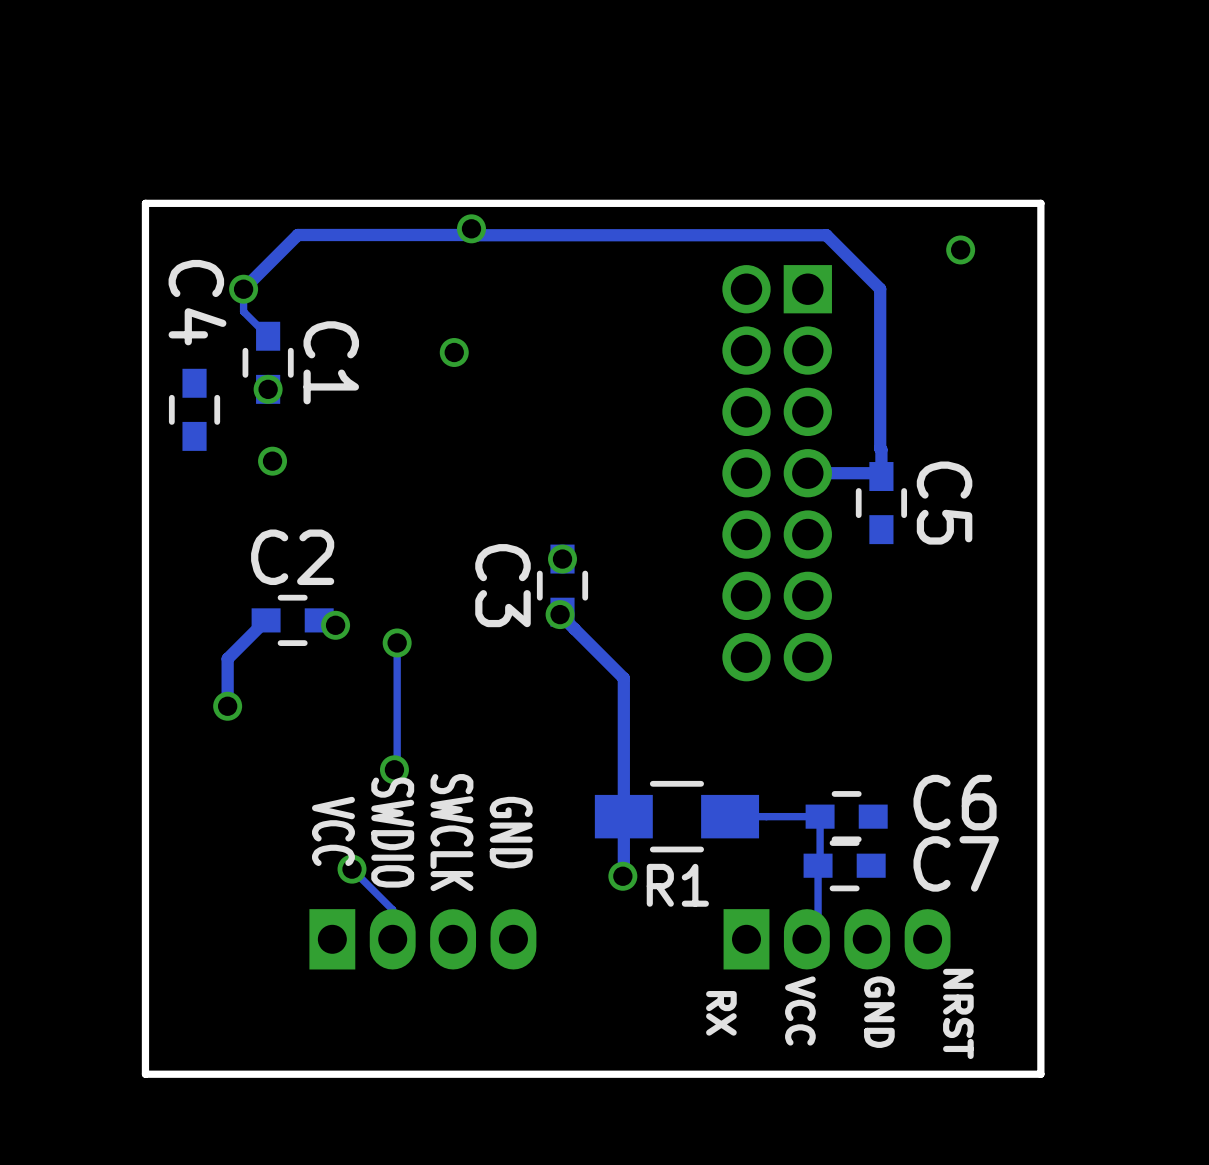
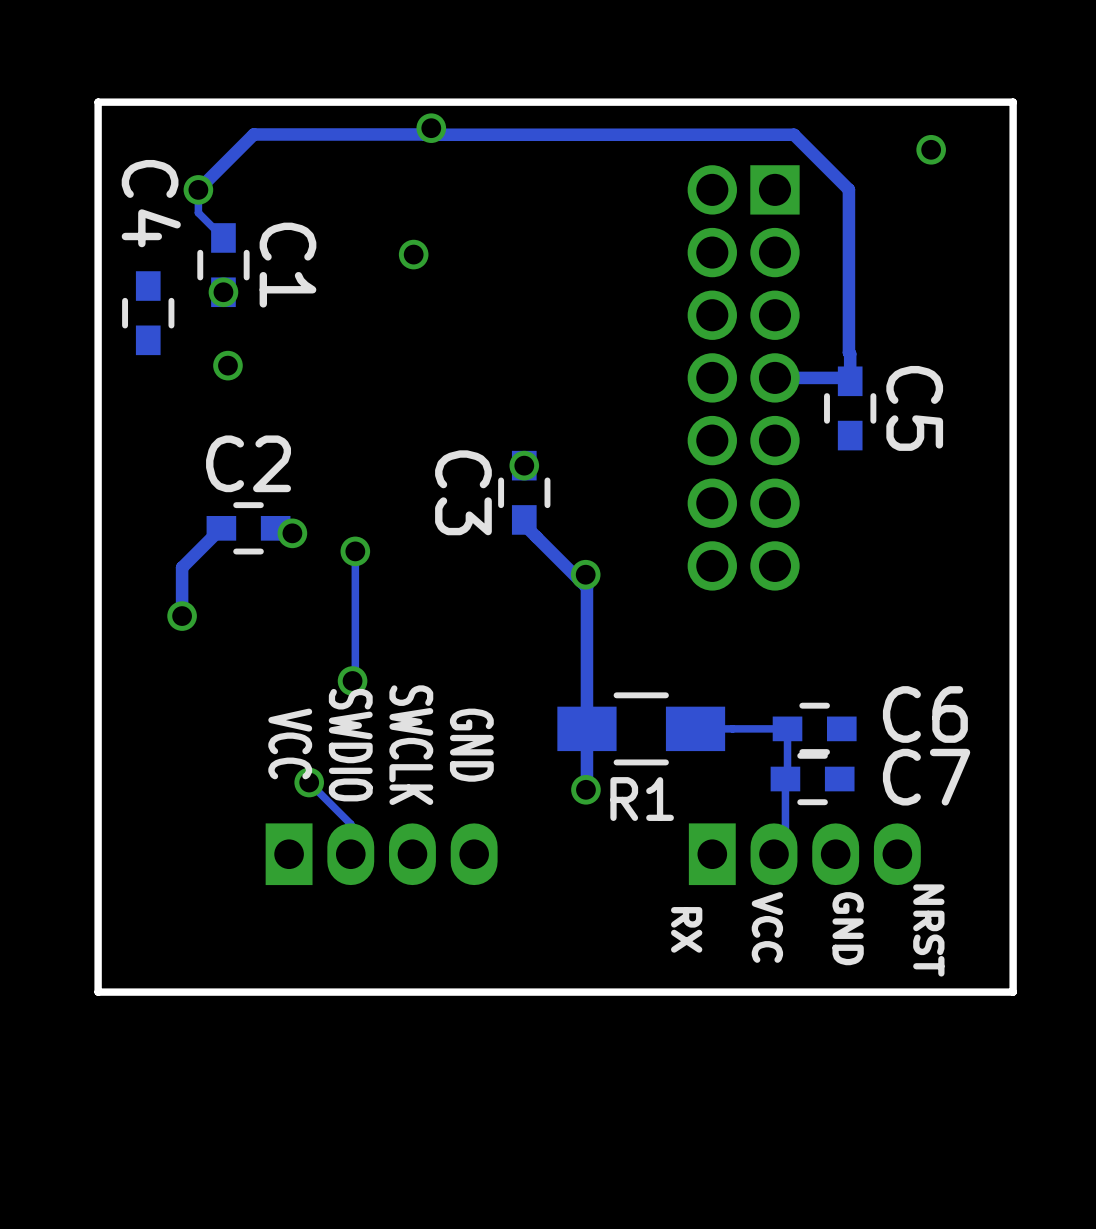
via position: (560, 614) -> (585, 574)

